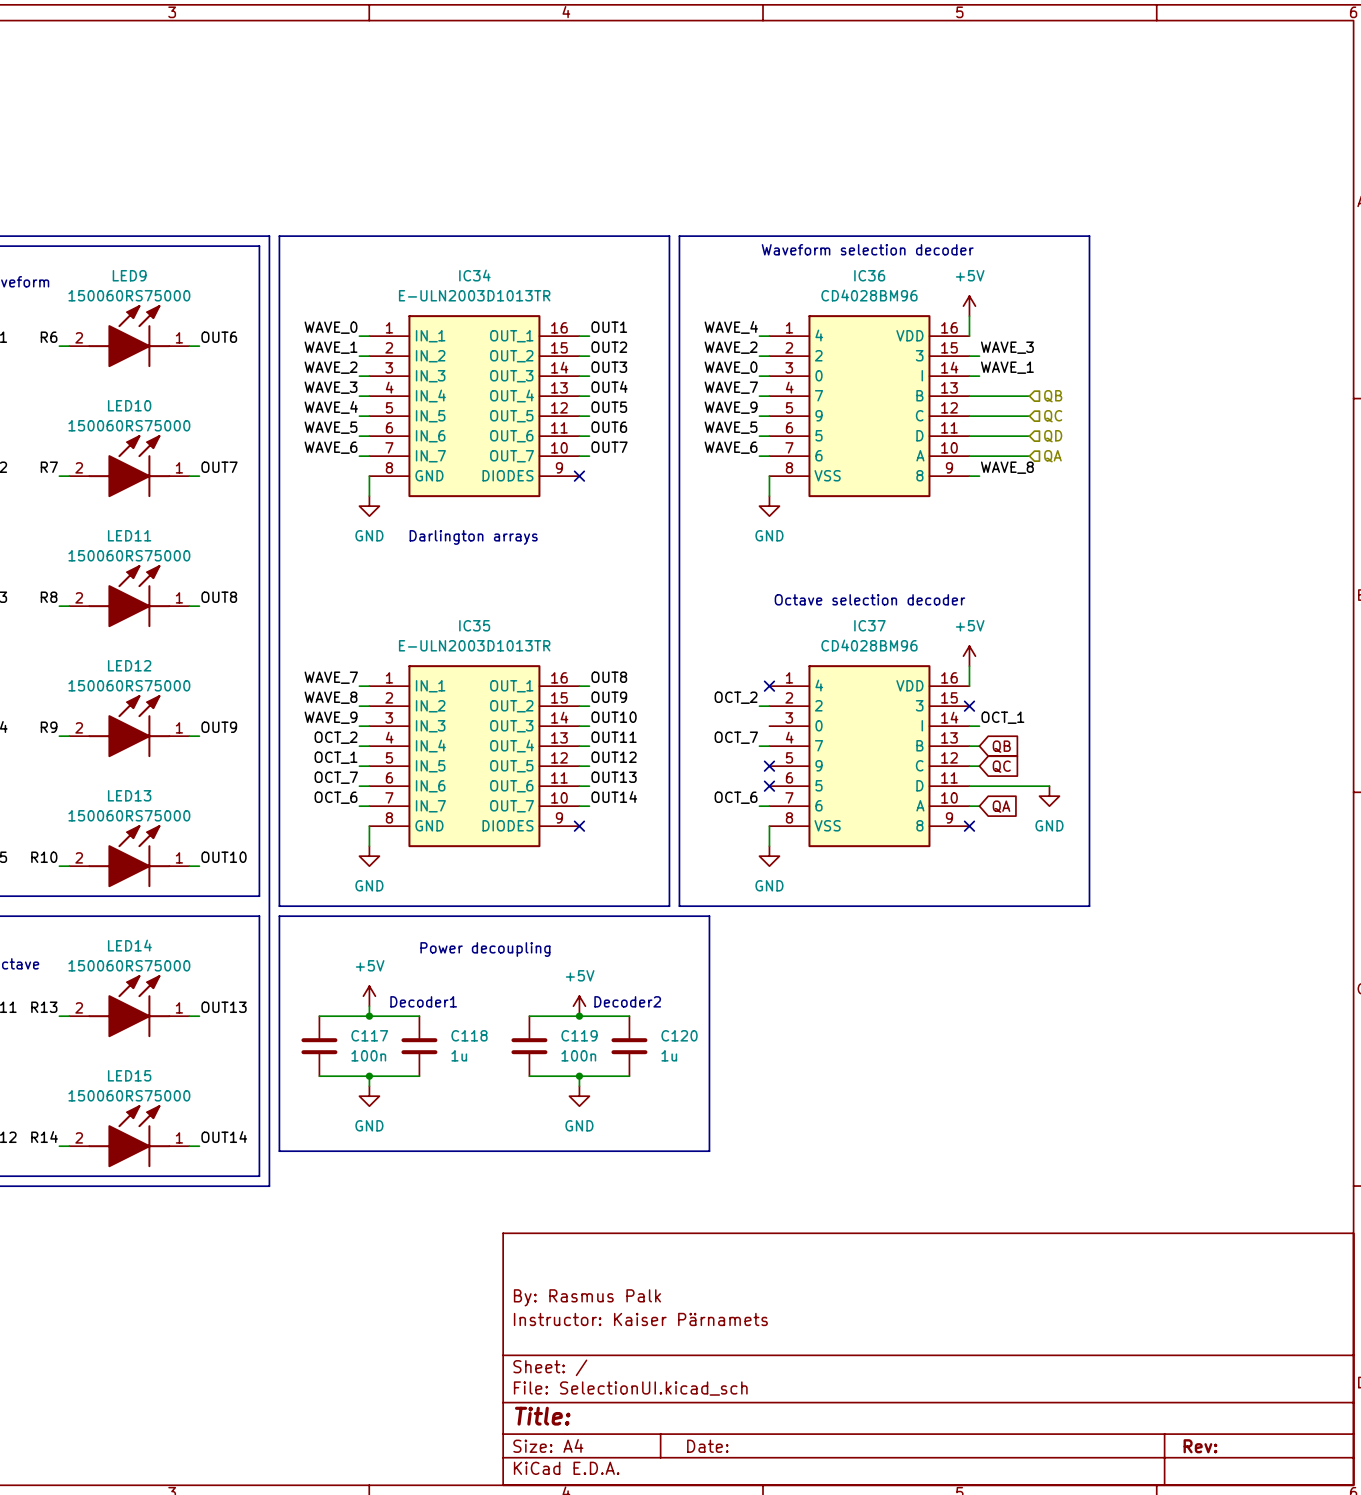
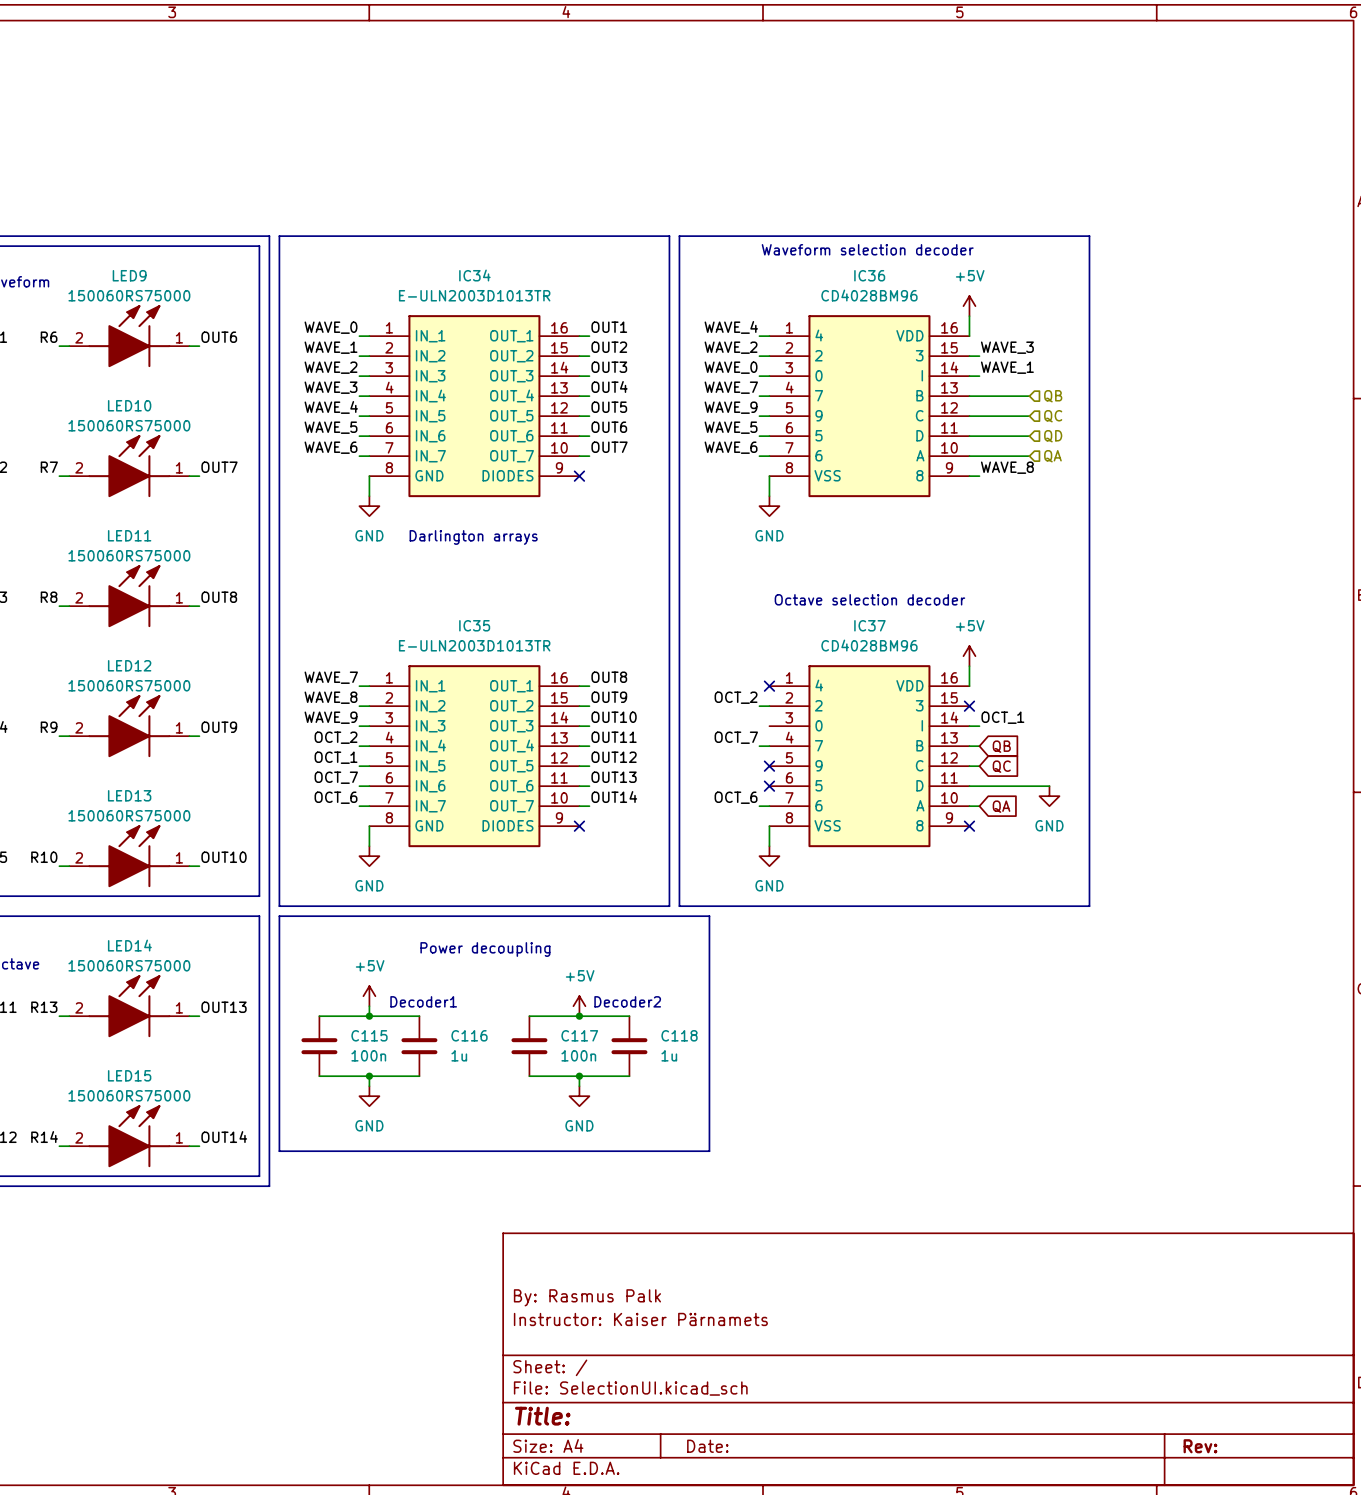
C117 name: C117 (369, 1035) -> C115 (369, 1035)
C118 name: C118 (469, 1035) -> C116 (469, 1035)
C119 name: C119 (579, 1035) -> C117 (579, 1035)
C120 name: C120 (679, 1035) -> C118 (679, 1035)

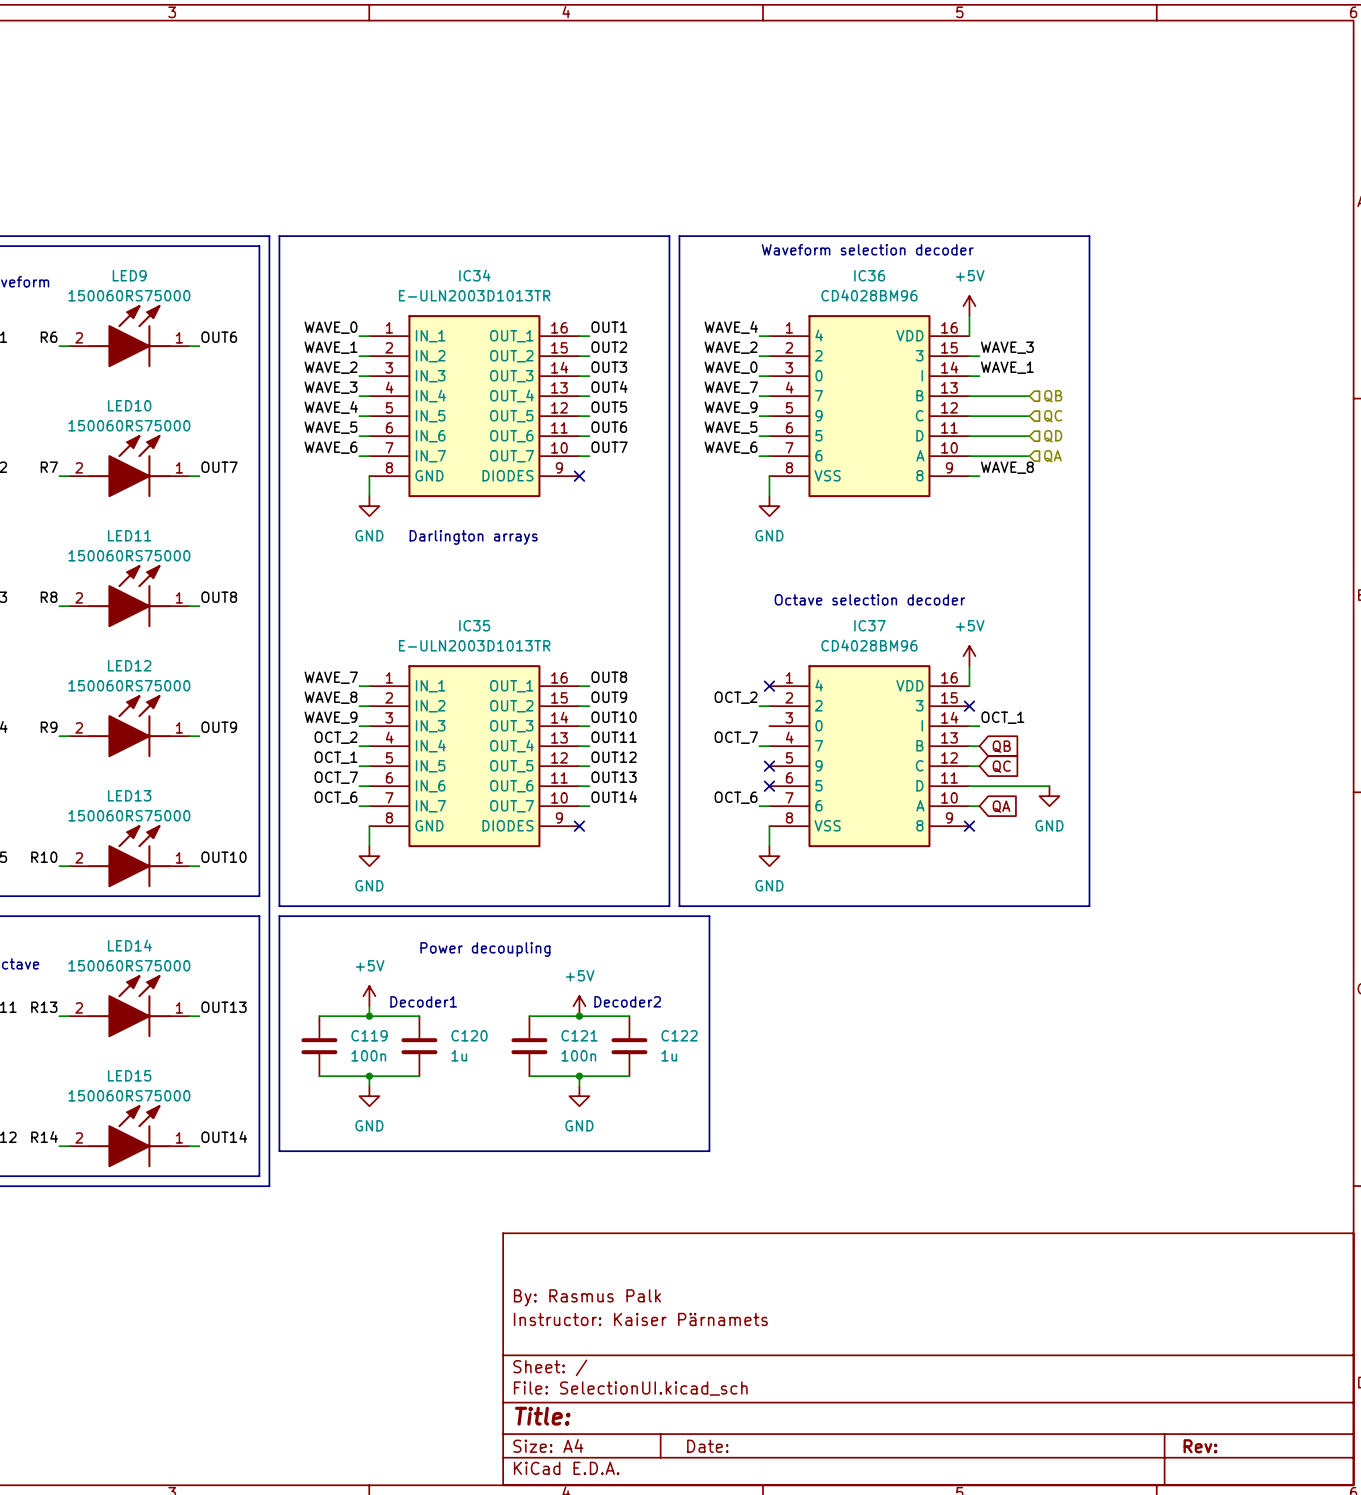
C115 name: C115 (369, 1035) -> C119 (369, 1035)
C116 name: C116 (469, 1035) -> C120 (469, 1035)
C117 name: C117 (579, 1035) -> C121 (579, 1035)
C118 name: C118 (679, 1035) -> C122 (679, 1035)

